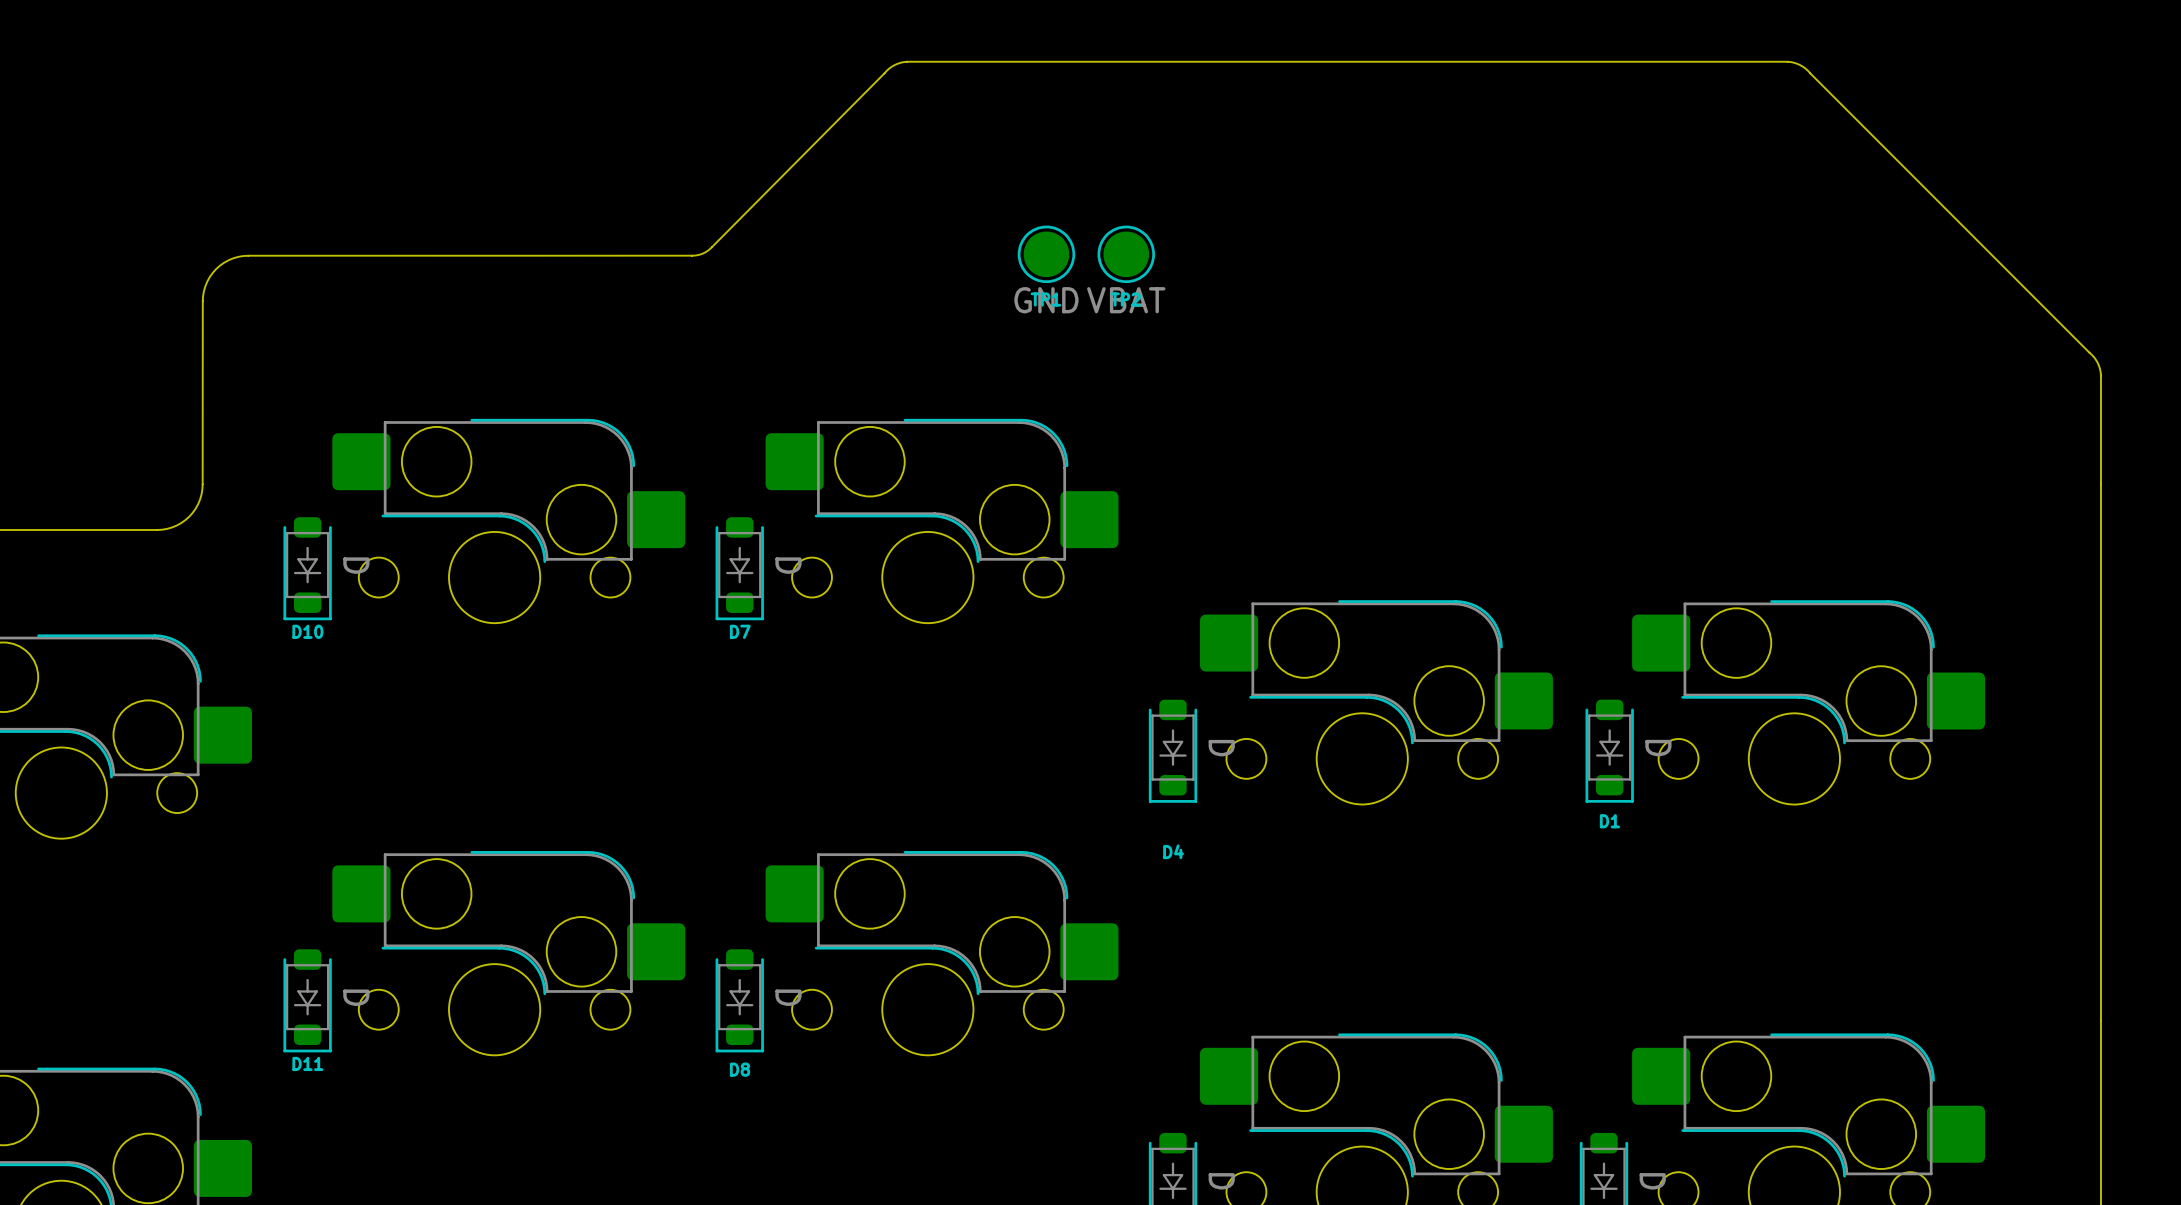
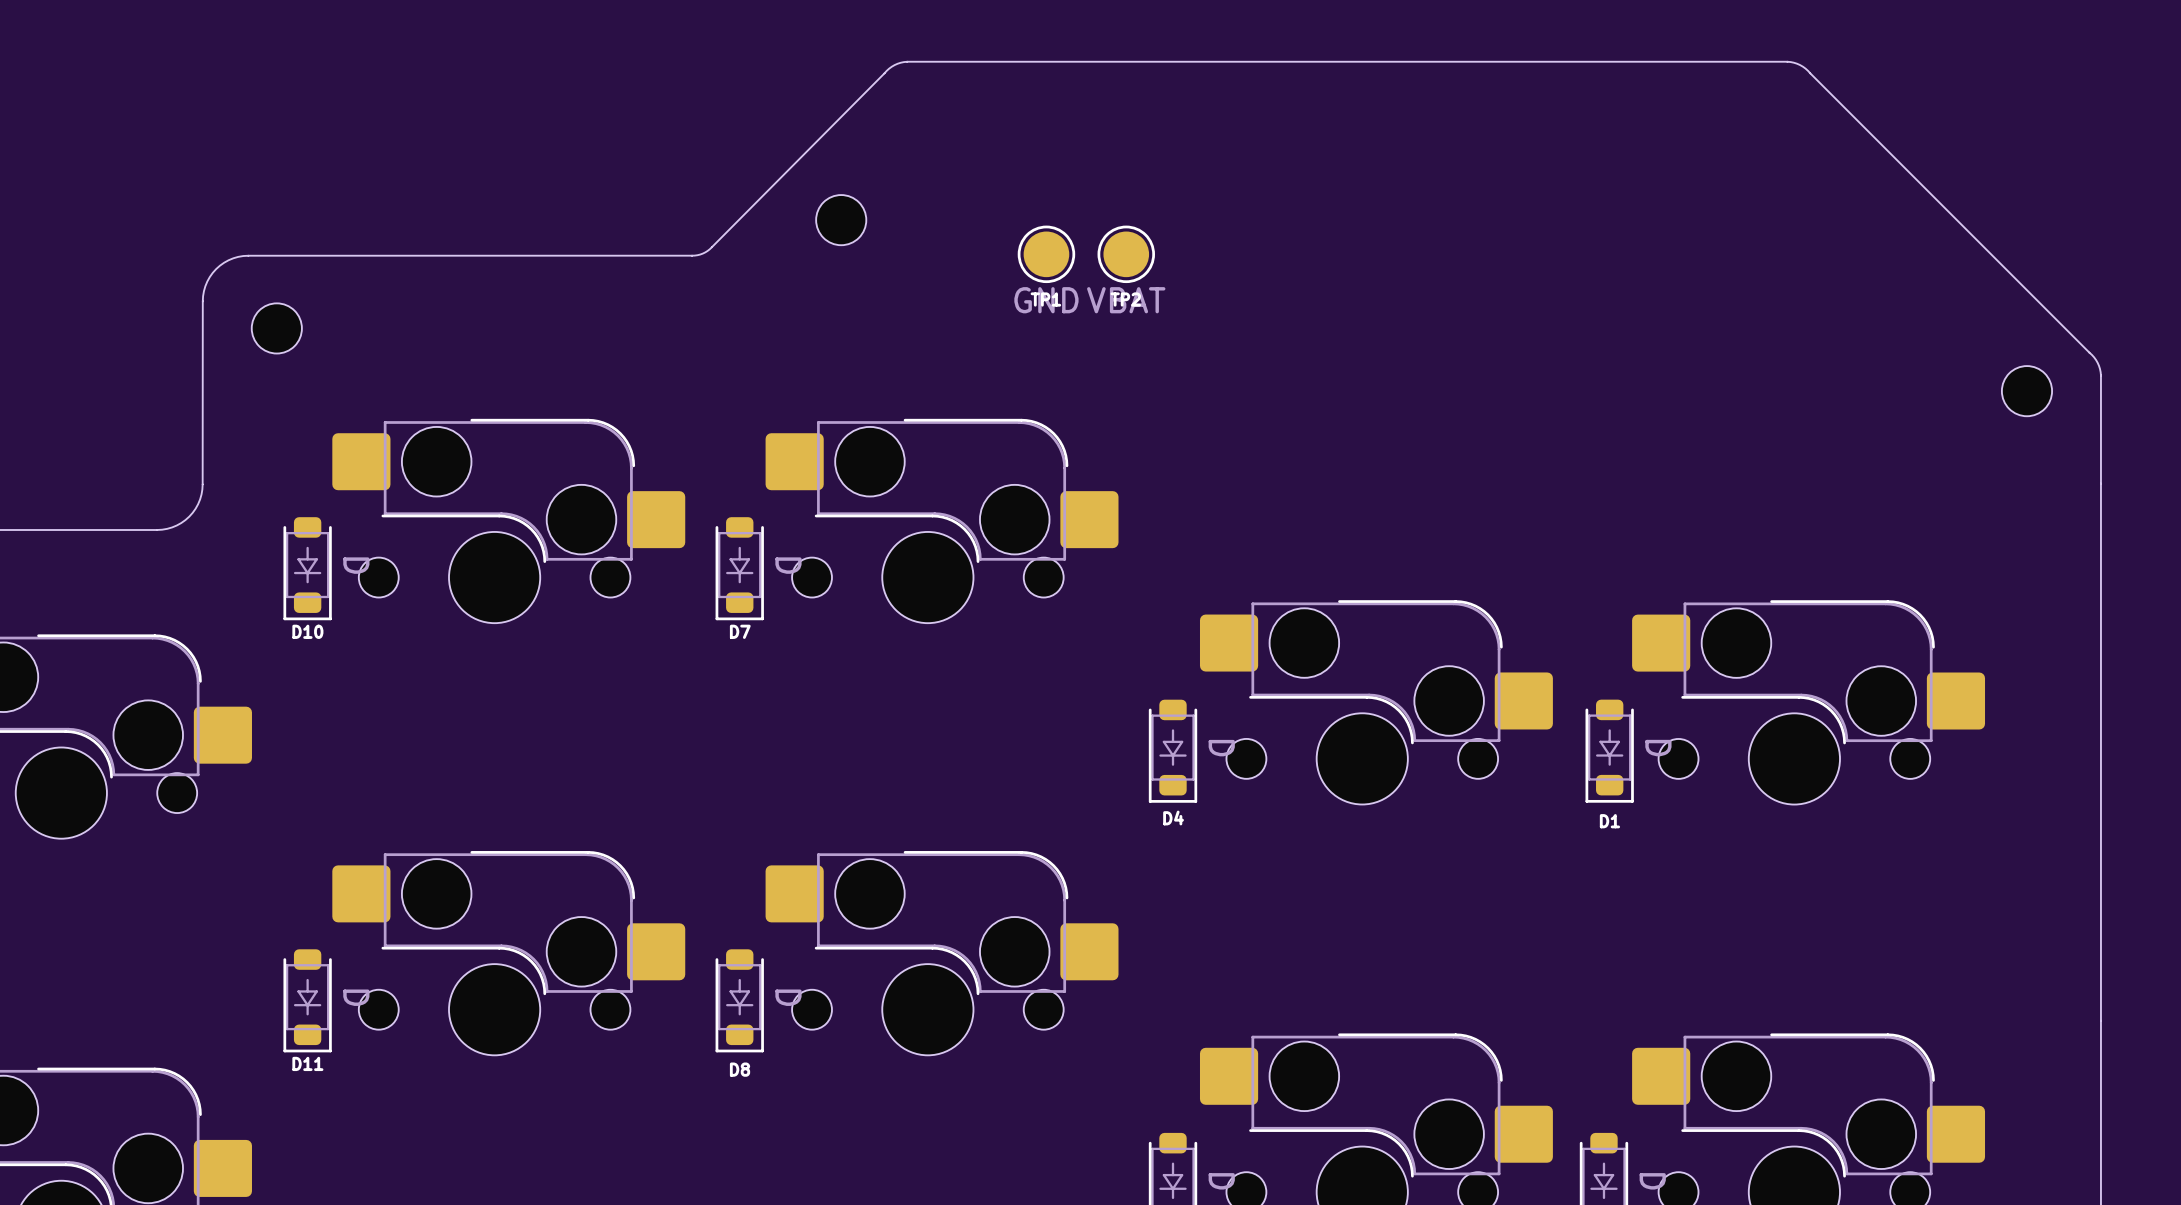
part: none -> (841, 220)
part: none -> (276, 328)
part: none -> (2026, 391)
D4 name position: D4 (1173, 851) -> D4 (1173, 818)

